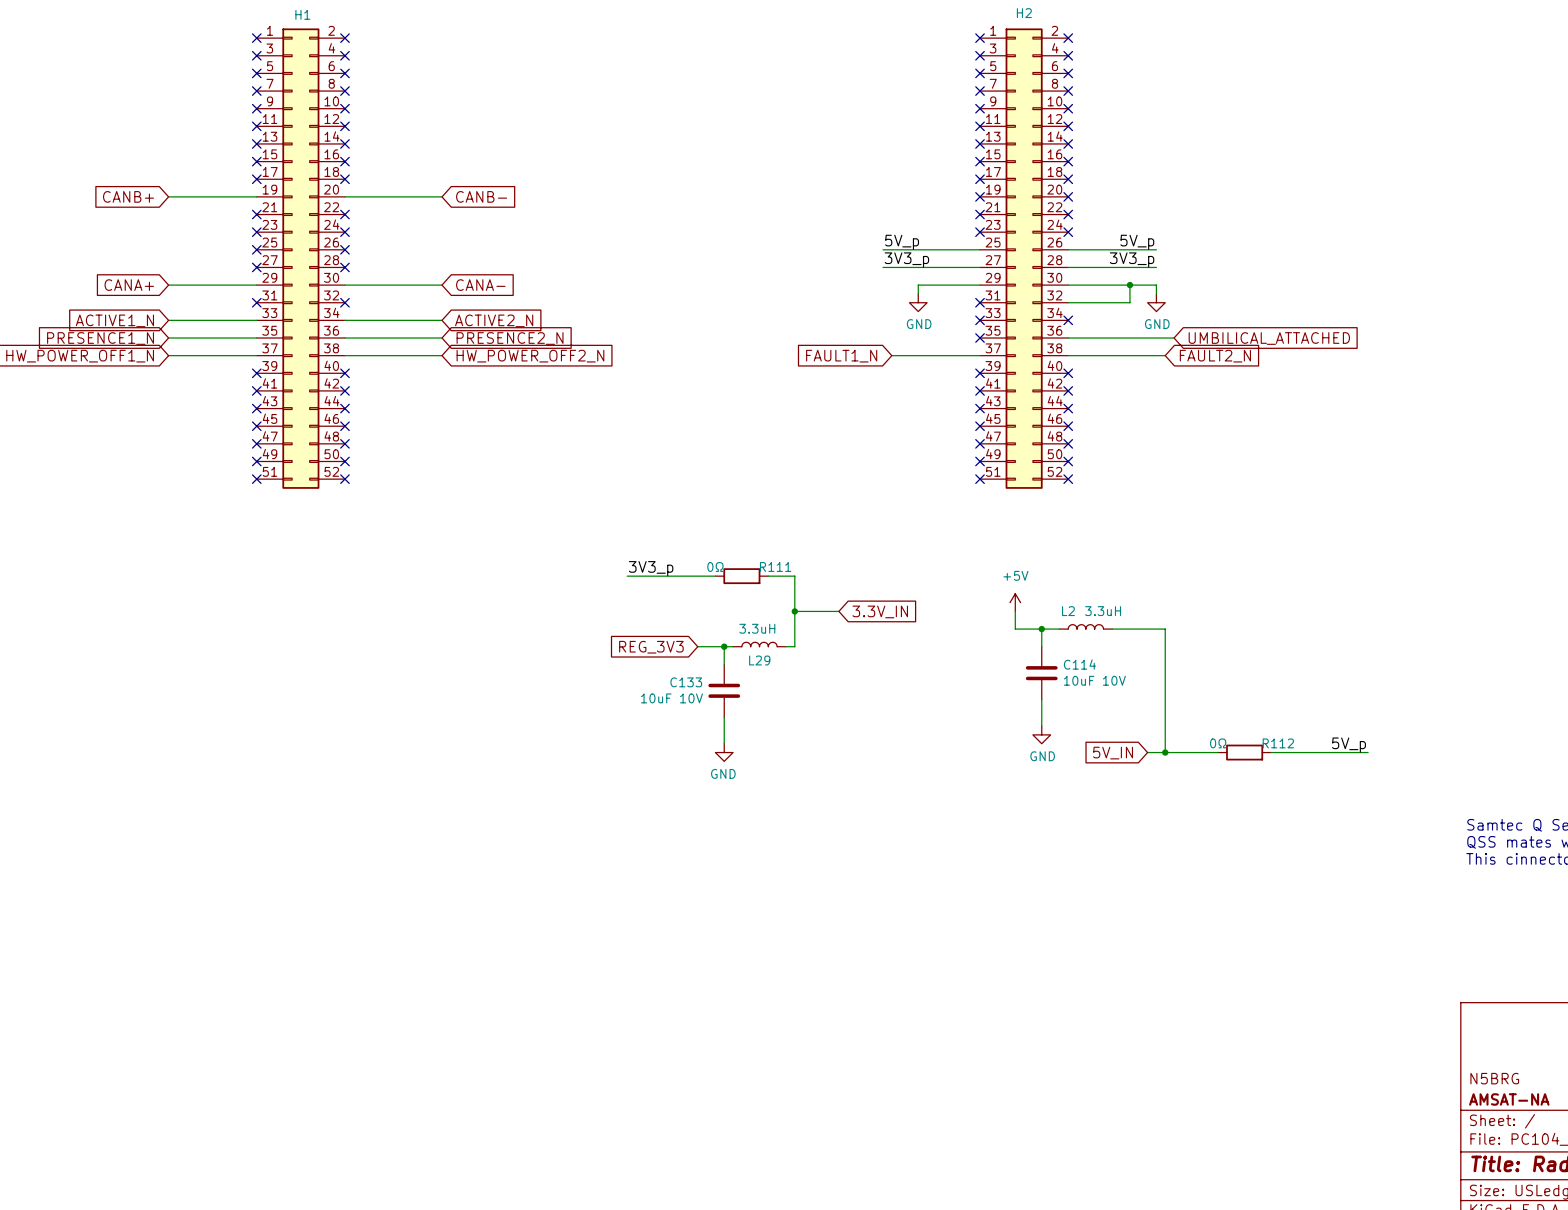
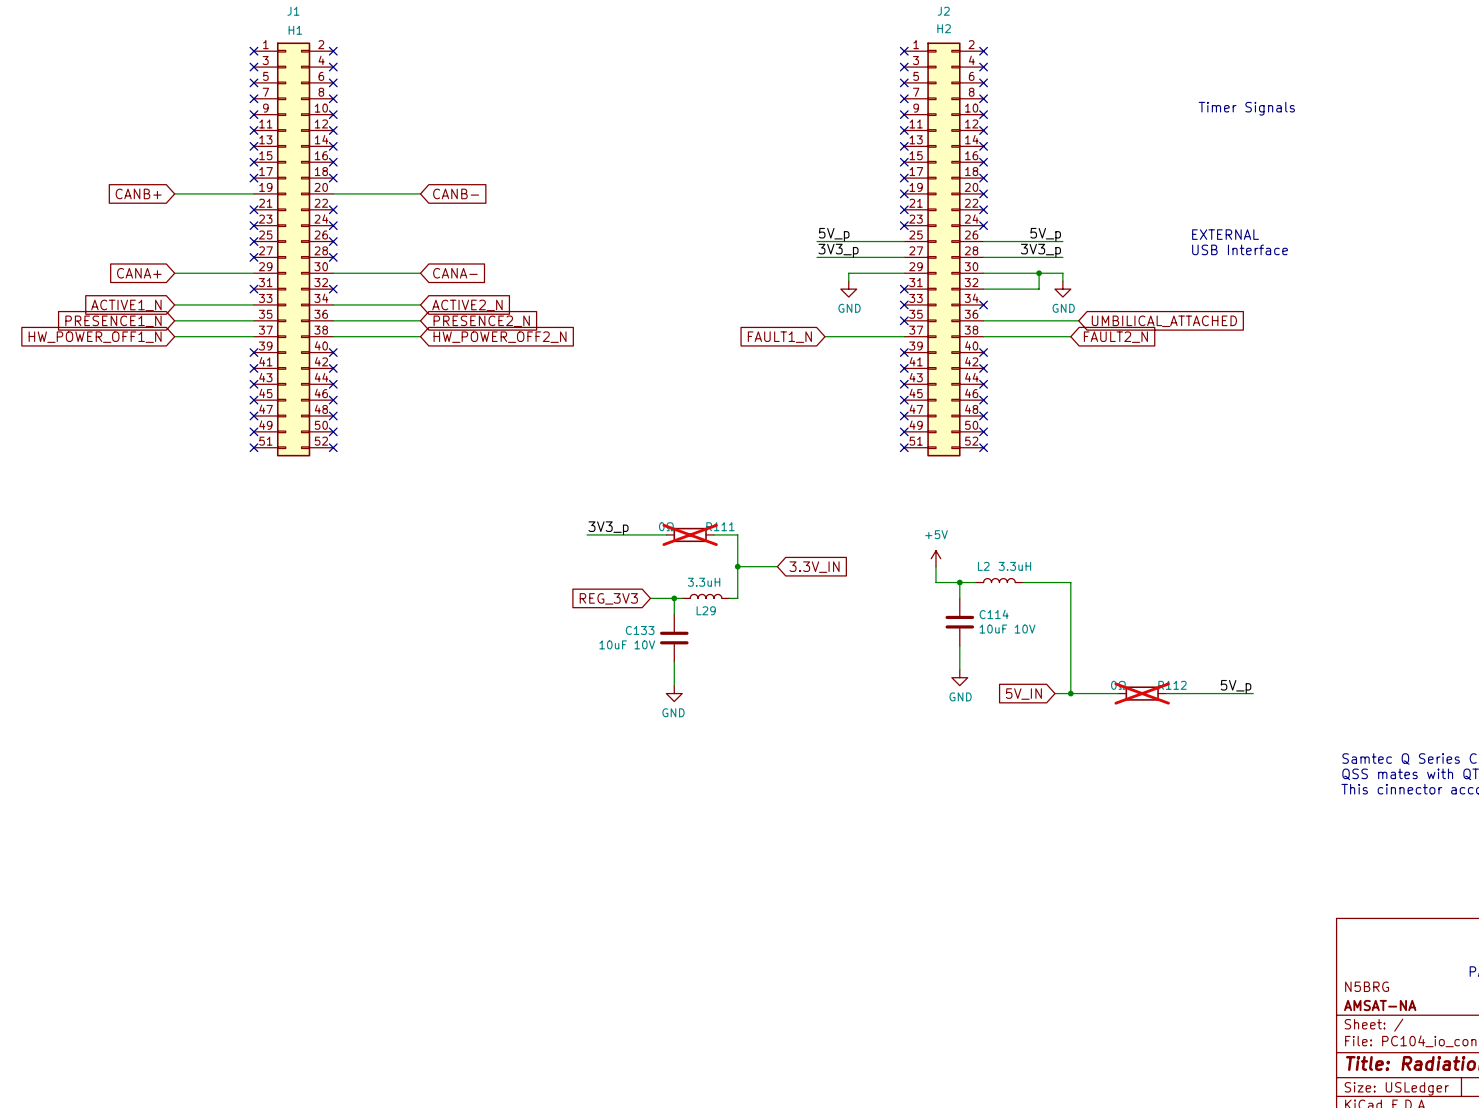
text: none -> Timer Signals (1246, 108)
text: none -> EXTERNAL (1225, 234)
text: none -> USB Interface (1240, 249)
R111 do-not-place cross: none -> (690, 534)
R112 do-not-place cross: none -> (1142, 693)

